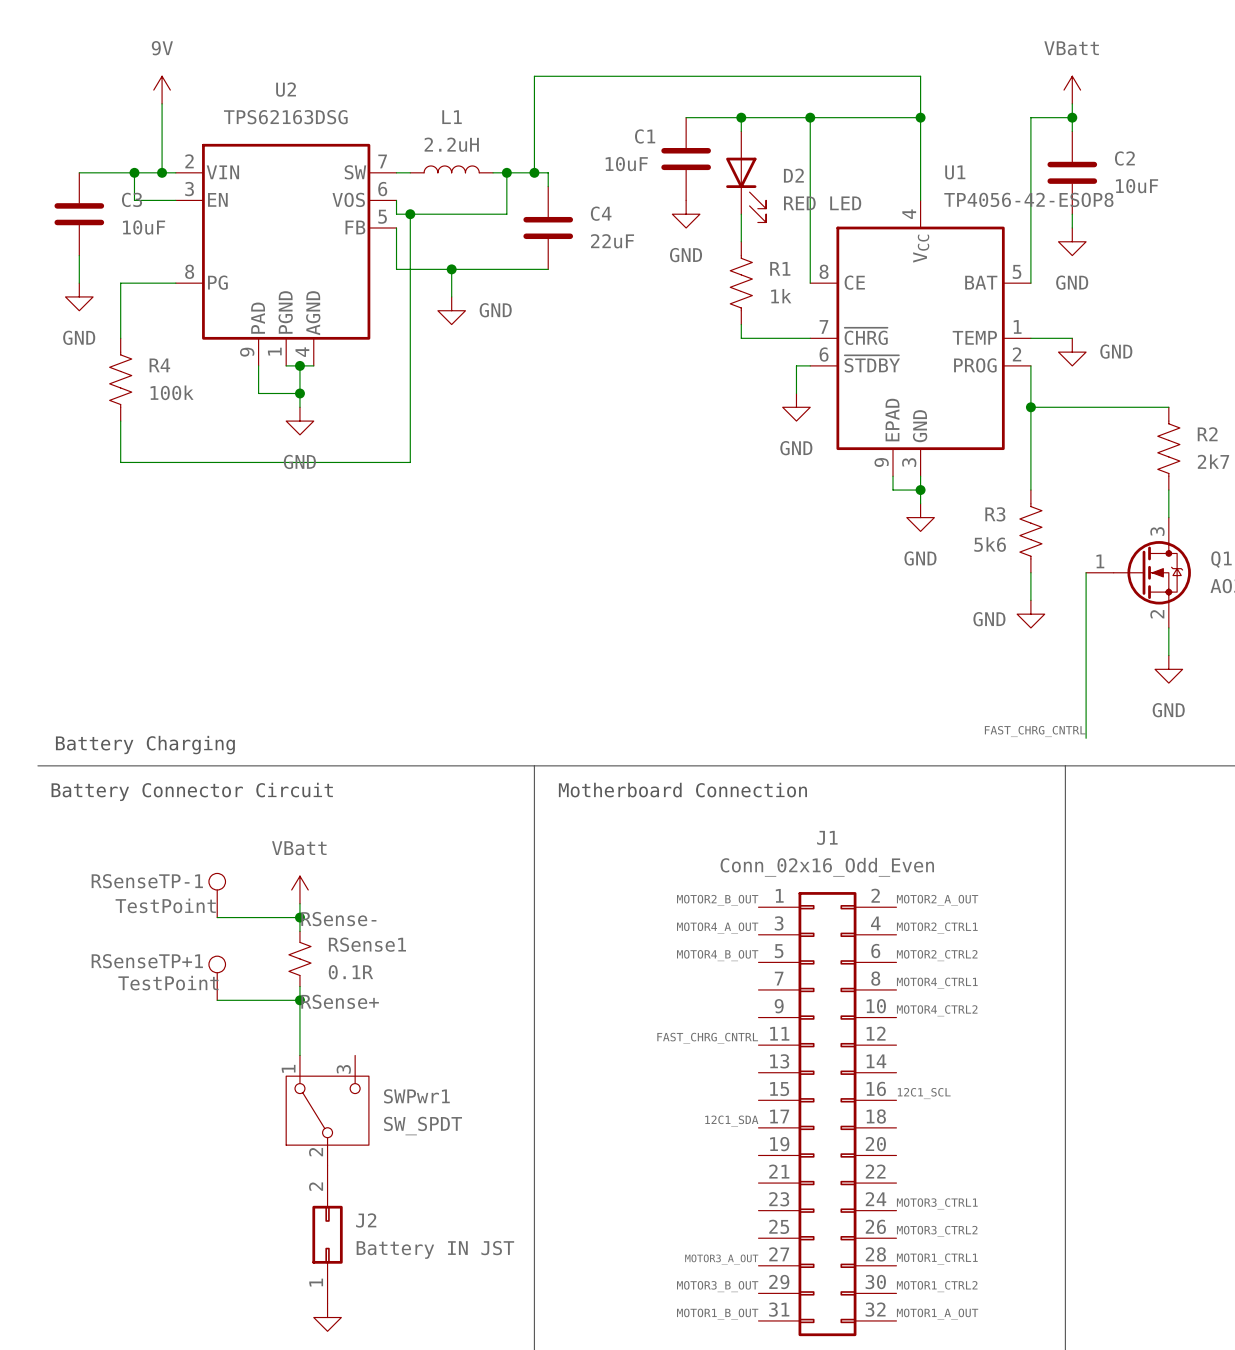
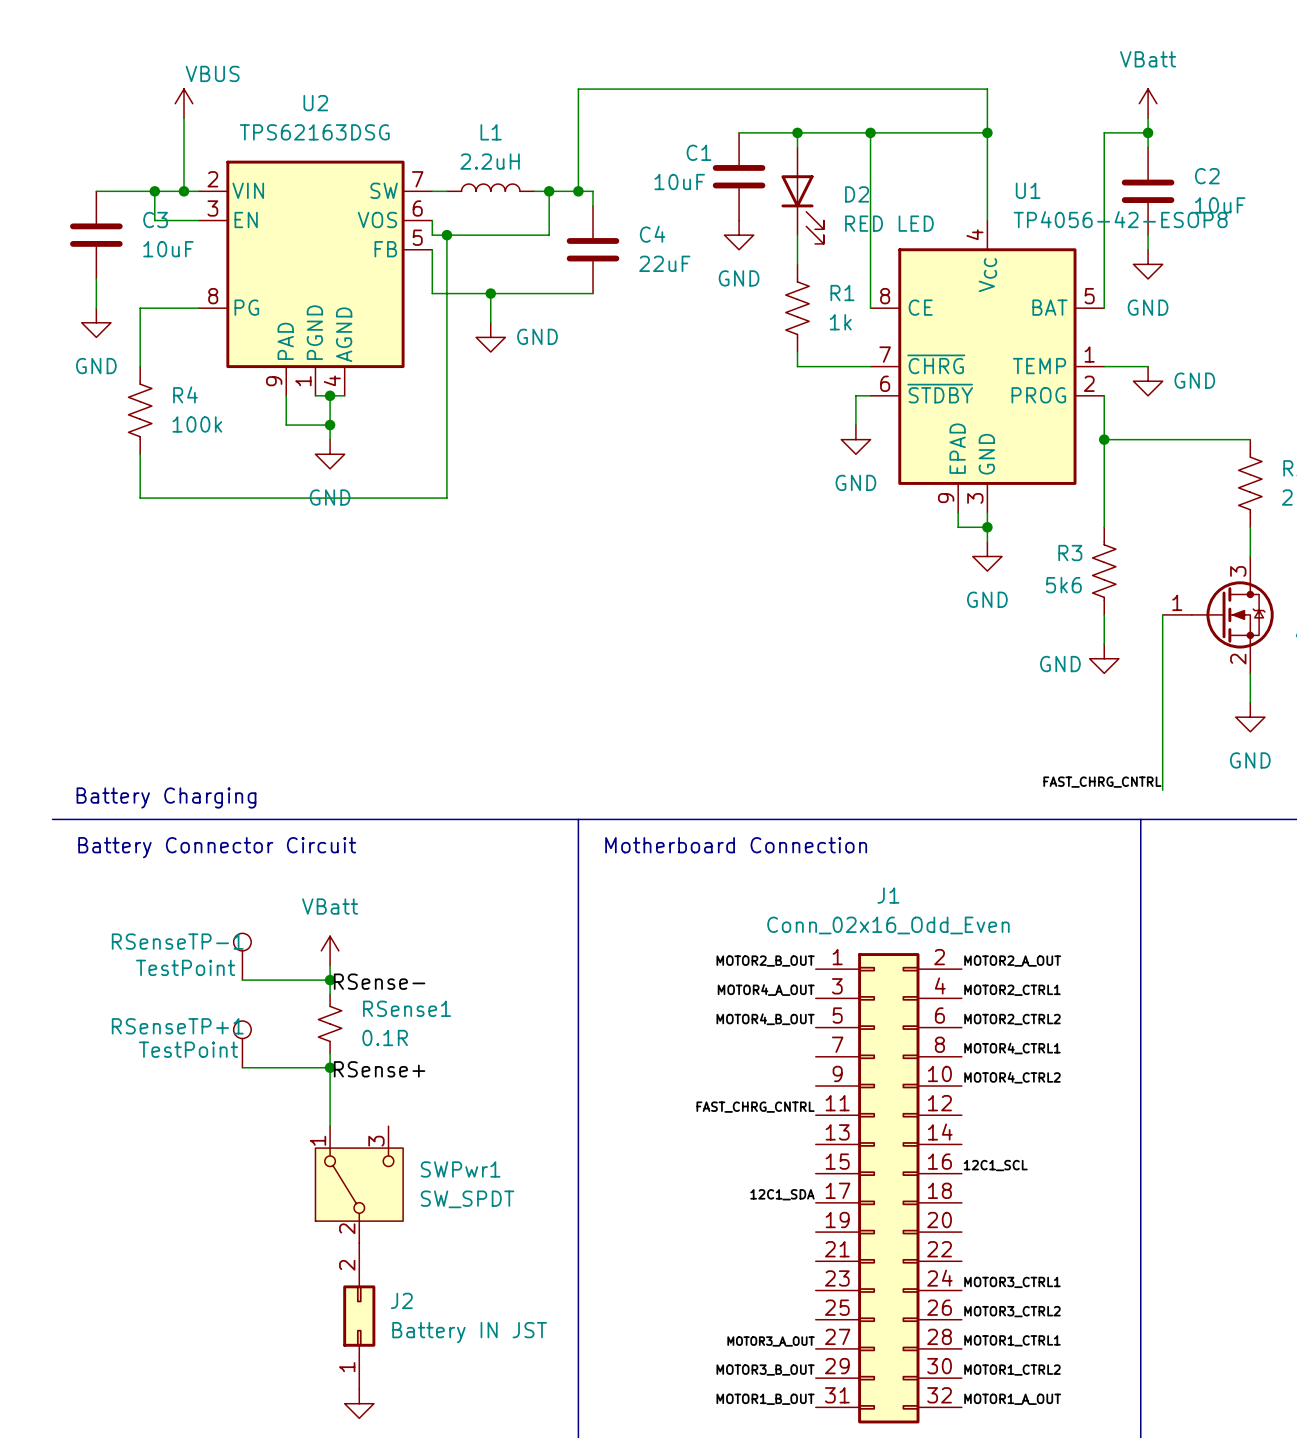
power symbol: 9V (162, 90) -> VBUS (184, 103)

